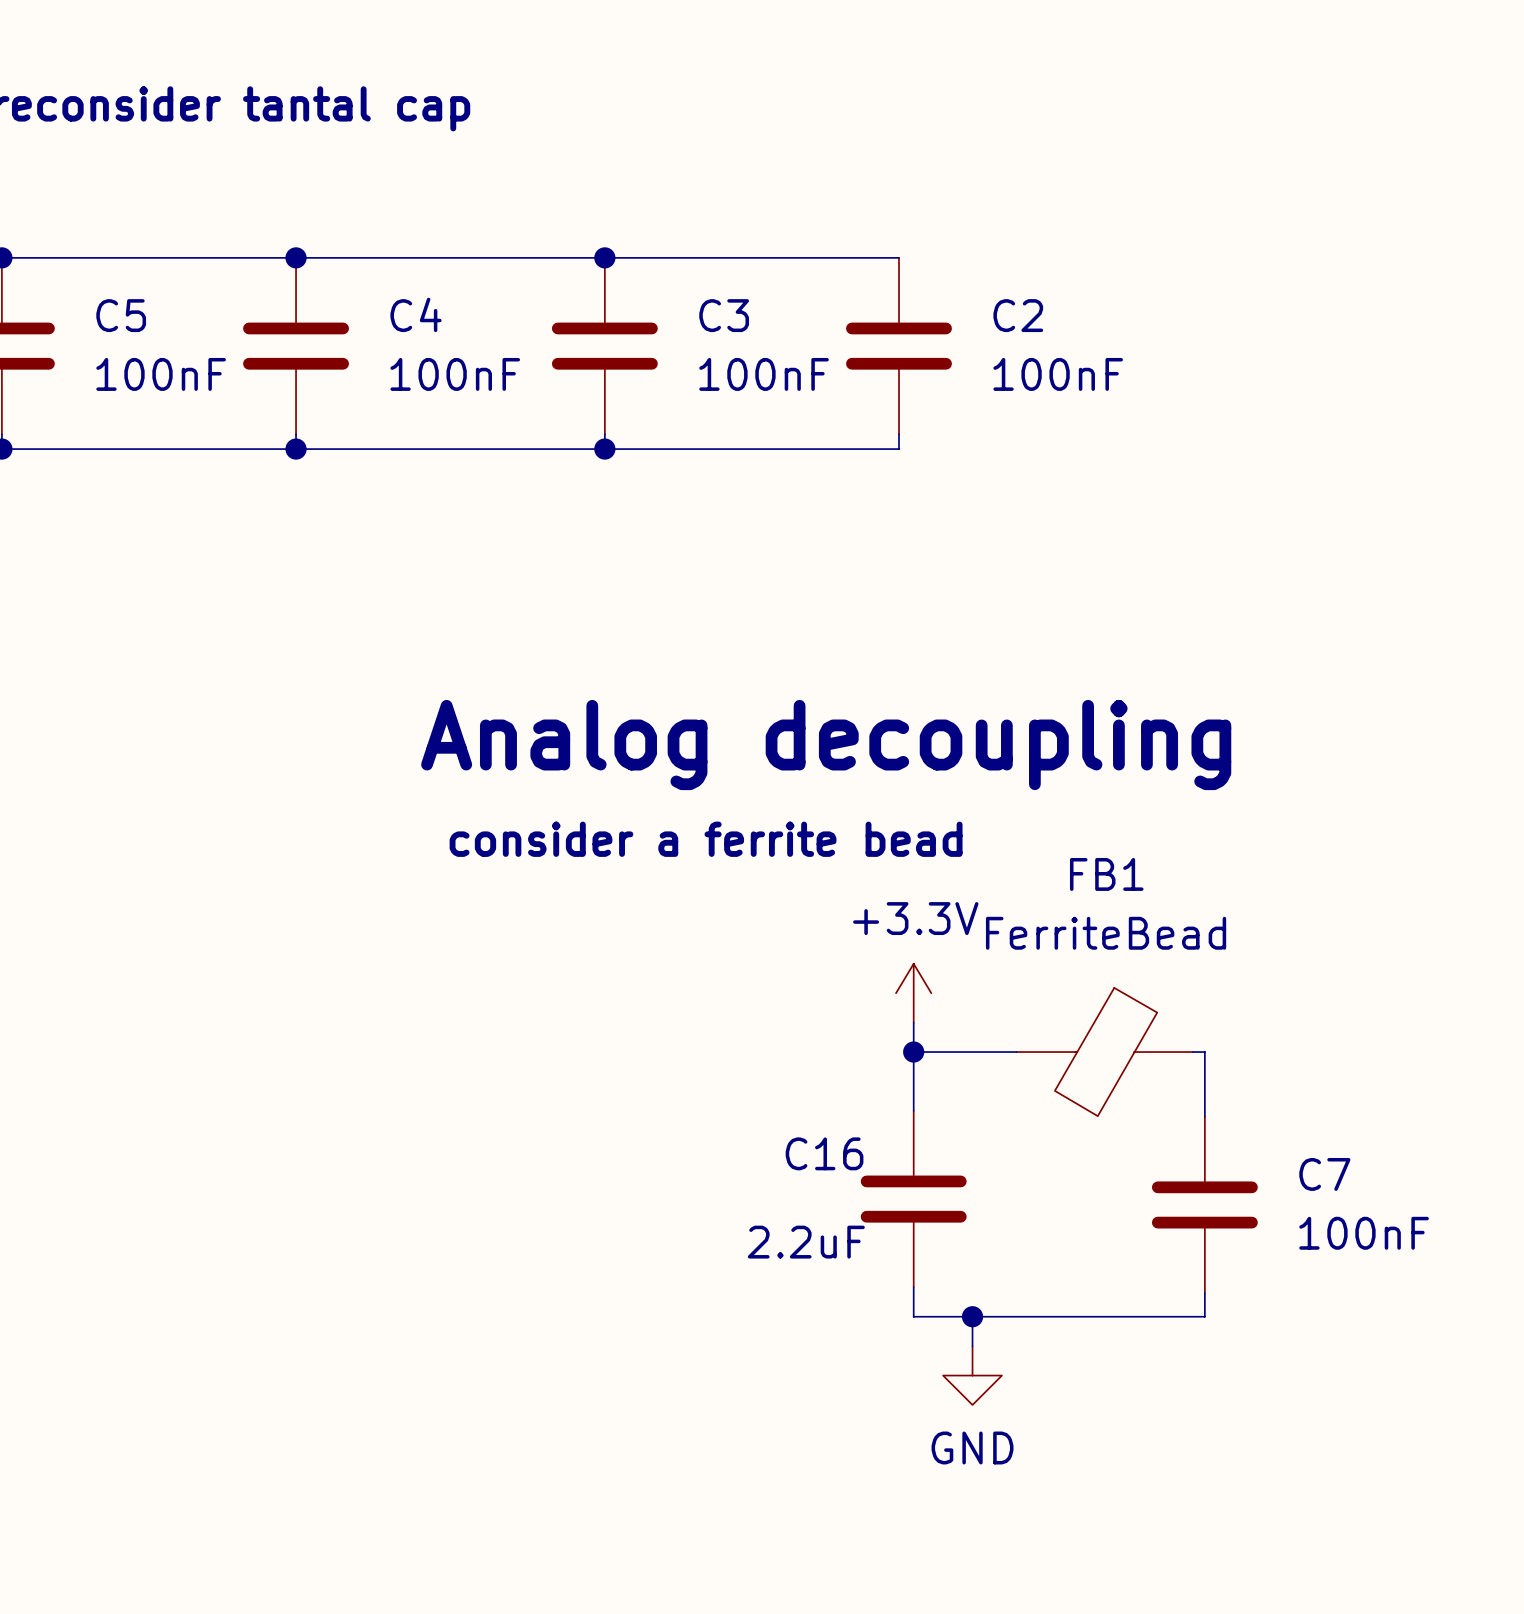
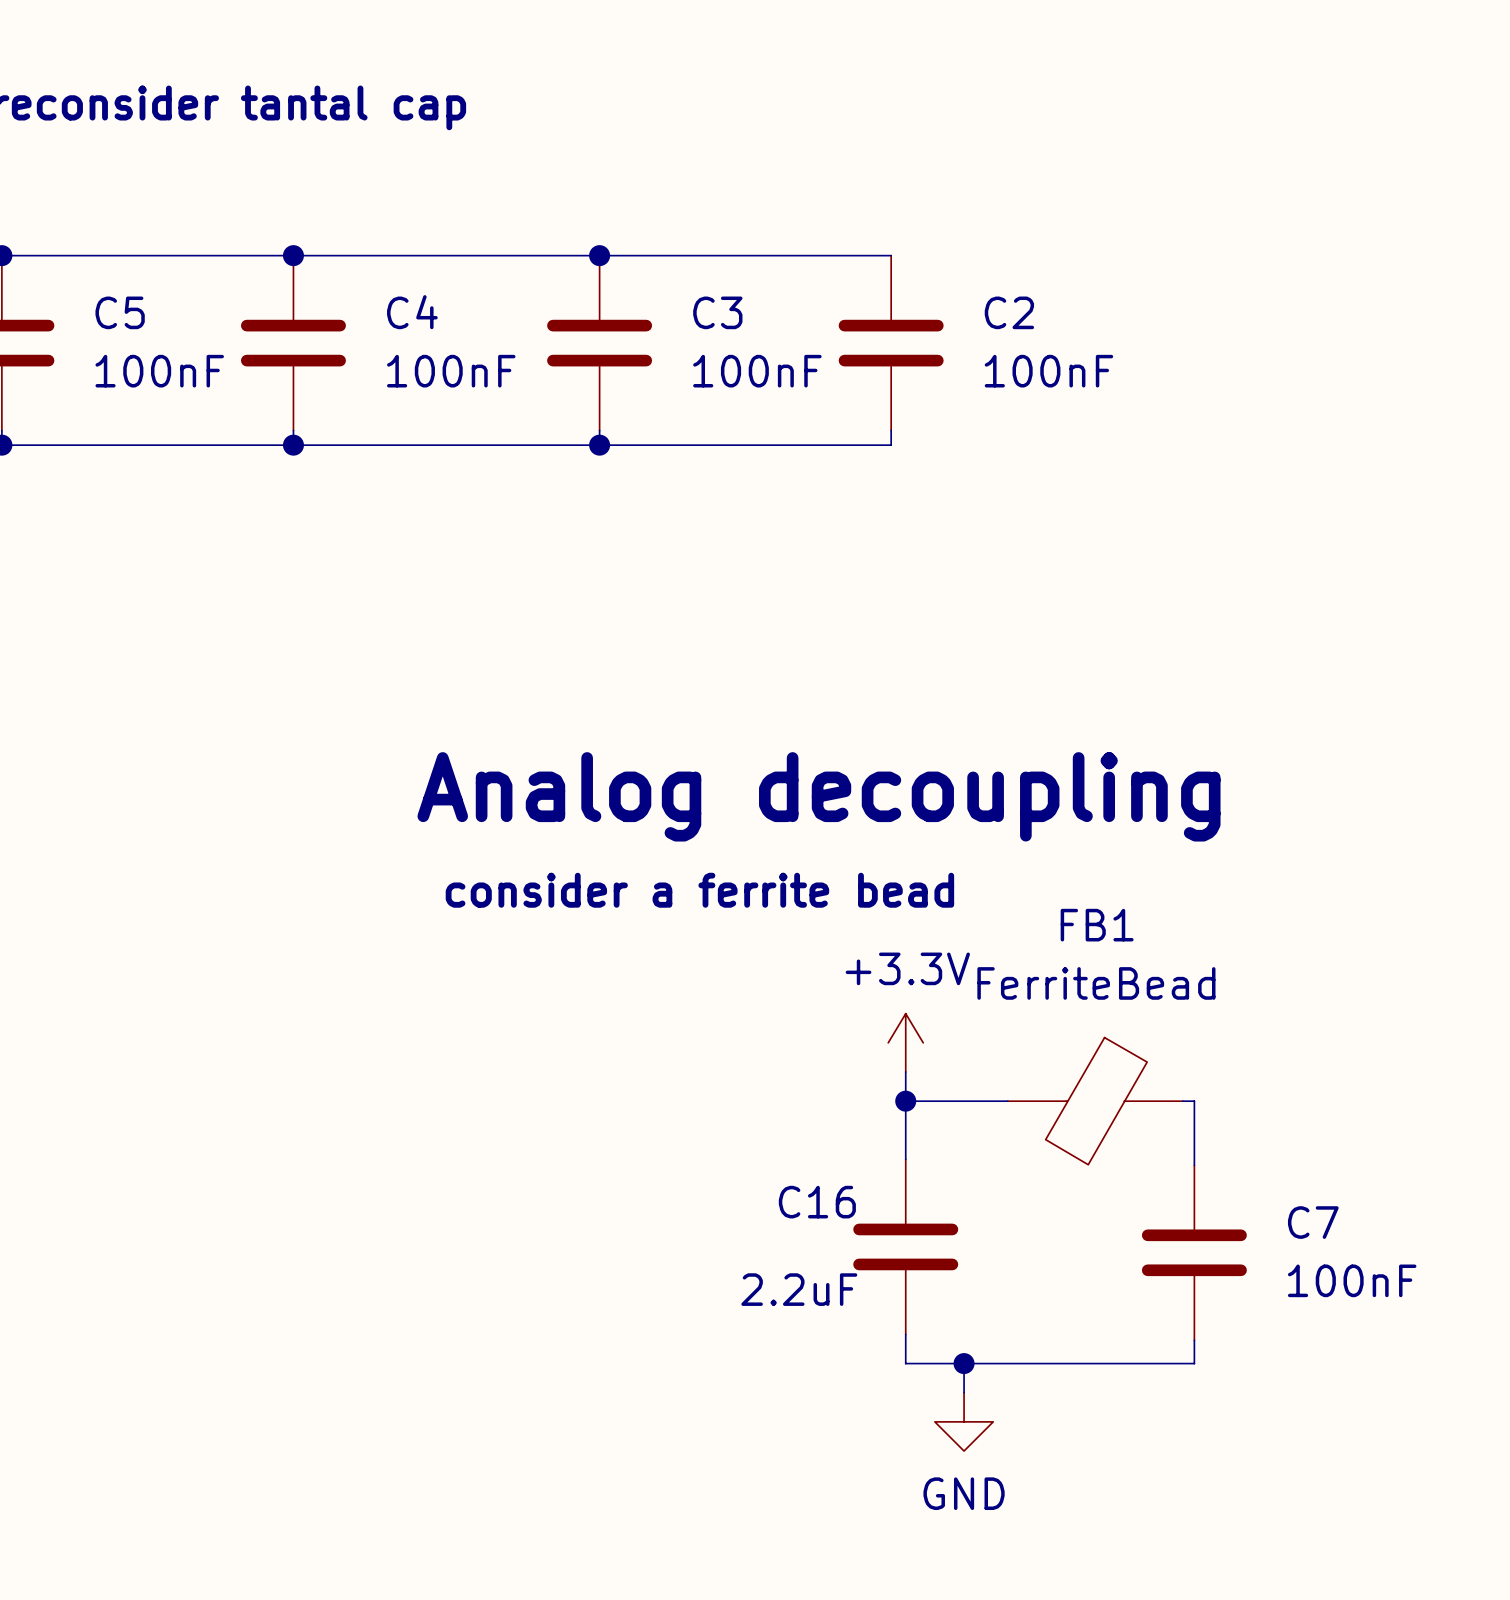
text position: Analog decoupling (826, 745) -> Analog decoupling (819, 796)
text position: consider a ferrite bead (706, 839) -> consider a ferrite bead (699, 890)
power symbol position: +3.3V (913, 993) -> +3.3V (905, 1042)
wire: (913, 1052) (1016, 1052) -> none
junction position: (913, 1052) -> (905, 1101)
FB1 position: (1104, 1052) -> (1095, 1101)
wire: (1193, 1052) (1204, 1052) (1204, 1110) -> (1182, 1101) (1194, 1101)
wire: none -> (1007, 1101) (905, 1101) (905, 1159)
C16 position: (913, 1199) -> (905, 1246)
C7 position: (1204, 1204) -> (1194, 1252)
wire: (913, 1287) (913, 1316) (1204, 1316) (1204, 1293) -> (905, 1334) (905, 1363) (1194, 1363) (1194, 1340)
wire: (972, 1316) (972, 1346) -> (964, 1363) (964, 1392)
junction position: (972, 1316) -> (964, 1363)
power symbol position: GND (972, 1375) -> GND (964, 1421)

